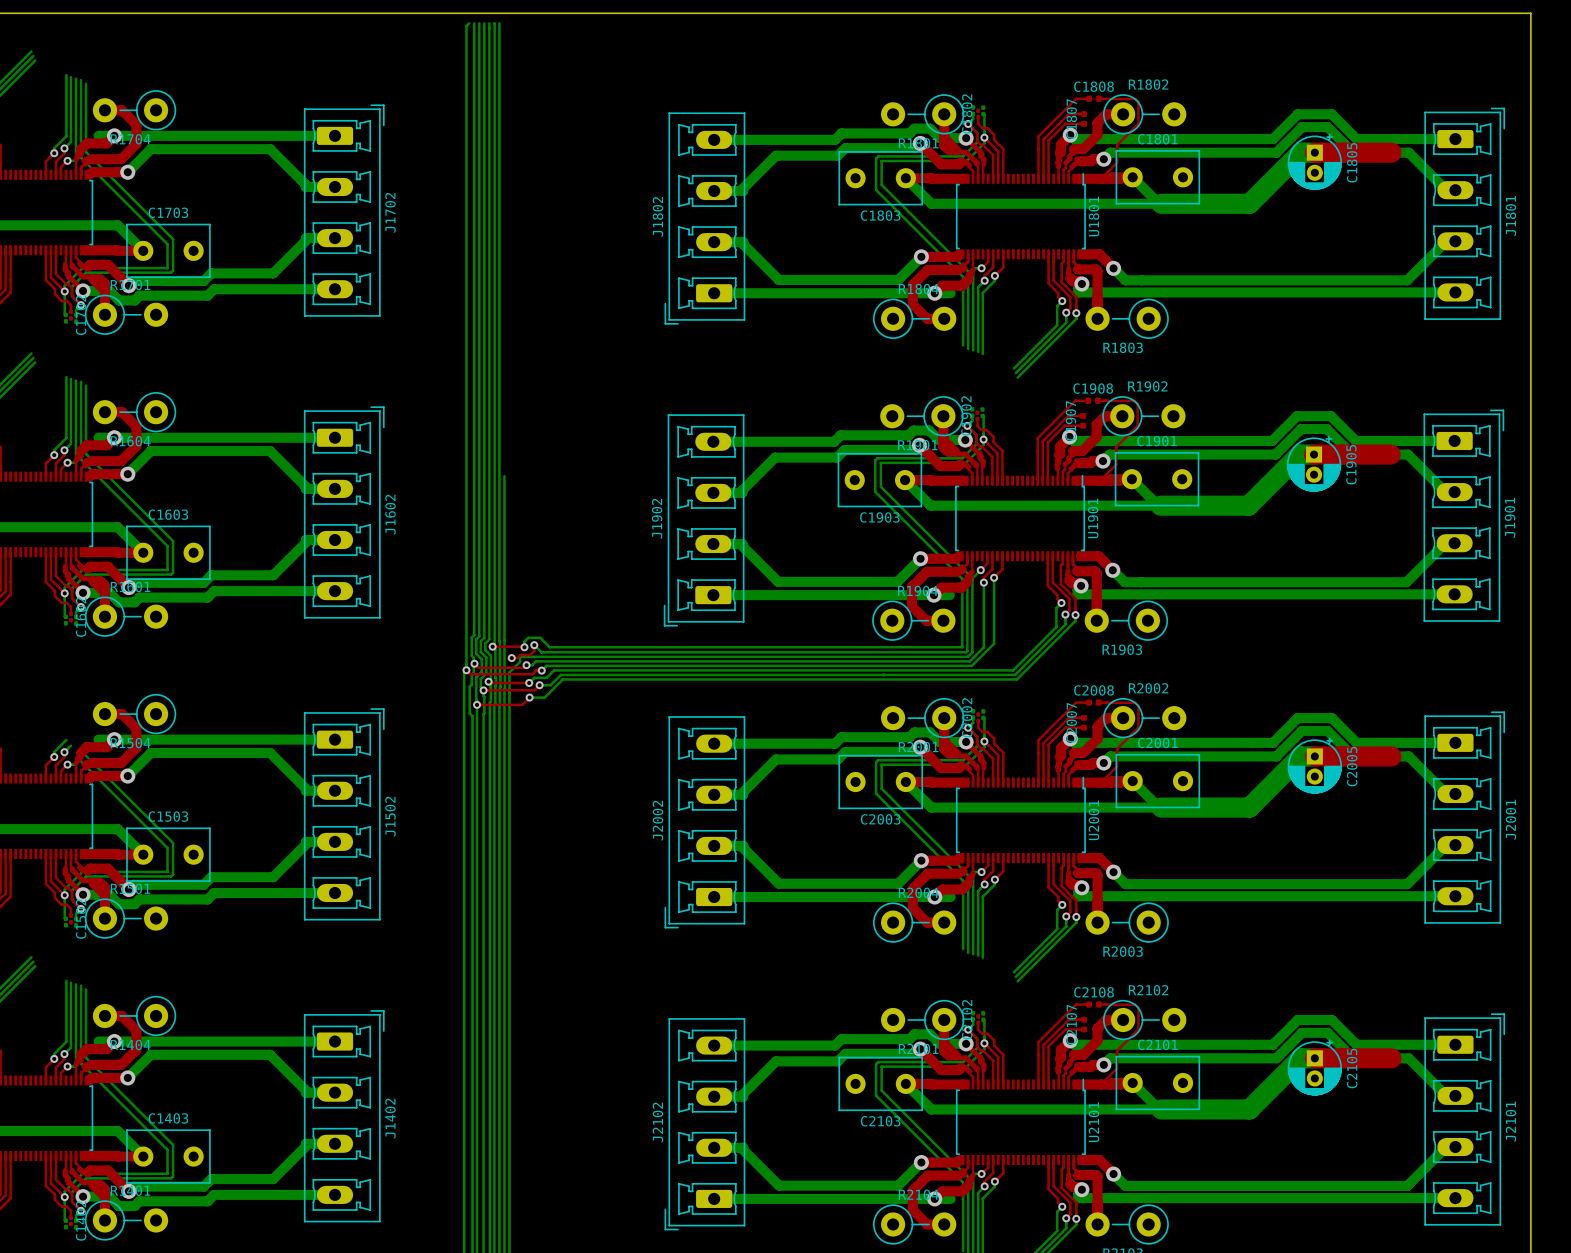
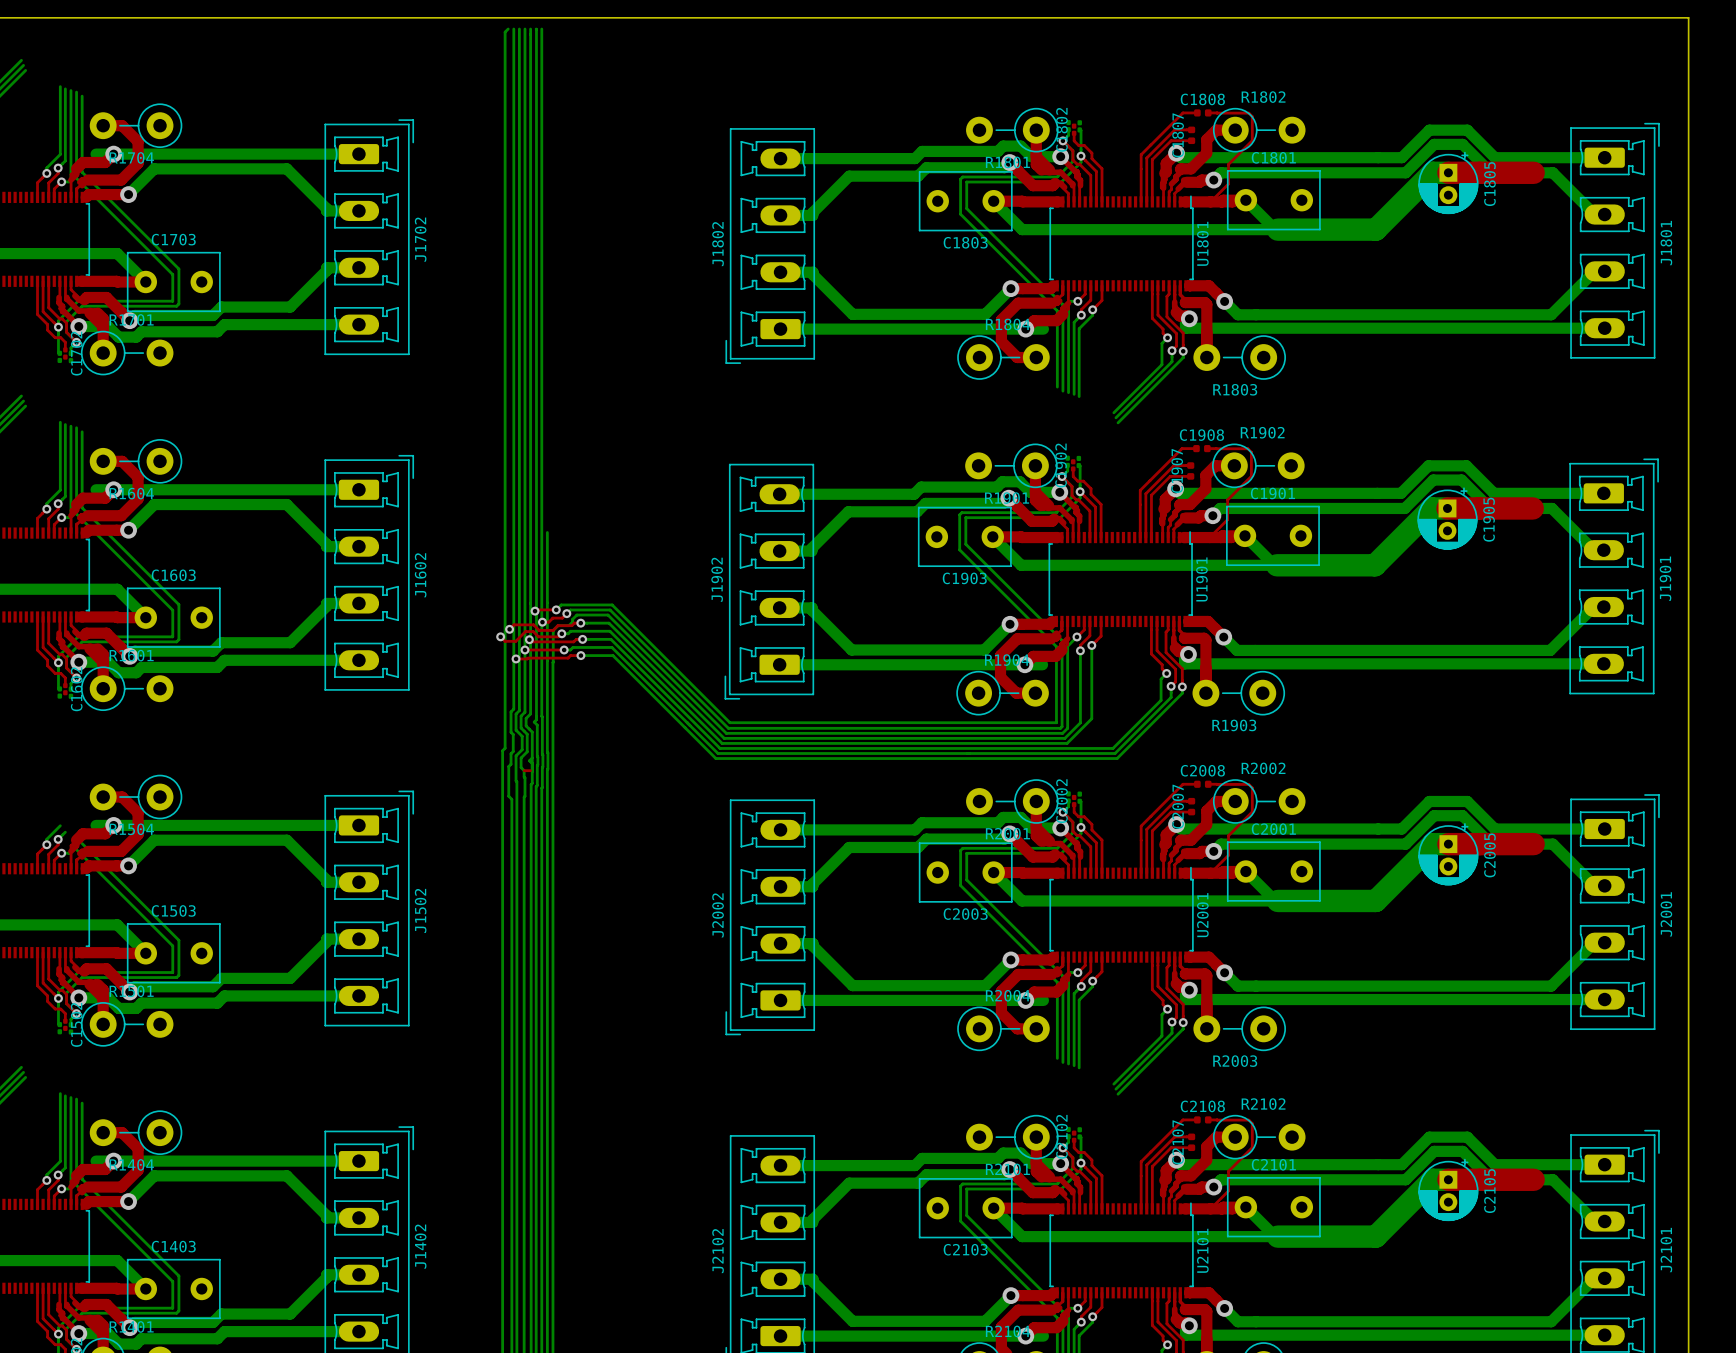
top track: none -> (556, 609) (535, 611)
via: none -> (556, 609)
via: none -> (535, 611)
top track: none -> (566, 613) (562, 618) (552, 618) (548, 622) (542, 622)
via: none -> (566, 613)
via: none -> (542, 622)
top track: none -> (580, 623) (574, 623) (571, 625) (557, 625) (553, 630) (539, 630) (533, 624) (514, 624) (509, 629)
via: none -> (580, 623)
via: none -> (509, 629)
top track: none -> (561, 633) (558, 636) (538, 636) (533, 631) (525, 631) (515, 641) (505, 641) (500, 636)
via: none -> (561, 633)
via: none -> (500, 636)
via: none -> (529, 639)
top track: none -> (582, 639) (576, 639) (573, 641) (531, 641) (529, 639)
via: none -> (582, 639)
top track: none -> (524, 649) (564, 649)
via: none -> (524, 649)
bottom track: none -> (564, 649) (570, 649) (573, 647) (611, 647) (690, 725)
via: none -> (564, 649)
top track: none -> (580, 655) (570, 655) (568, 658) (516, 658)
via: none -> (580, 655)
via: none -> (516, 658)
top track: (534, 645) (534, 650) (530, 655) (520, 655) (517, 658) (511, 658) -> none
bottom track: (534, 645) (541, 652) (667, 652) -> (566, 613) (570, 609) (610, 609) (728, 728)
via: (534, 645) -> none
top track: (492, 646) (524, 647) -> none
via: (492, 646) -> none
bottom track: (524, 647) (524, 641) (528, 637) (540, 637) (549, 647) (668, 647) -> (556, 609) (561, 604) (612, 604) (729, 722)
via: (524, 647) -> none
bottom track: (665, 656) (520, 656) (520, 661) (509, 672) -> (726, 733) (608, 615) (576, 615) (568, 625) (558, 625) (553, 630) (552, 750)
via: (511, 658) -> none
bottom track: (663, 661) (536, 661) (532, 665) (526, 665) -> (724, 738) (609, 623) (580, 623)
top track: (474, 663) (478, 667) (523, 667) (526, 665) -> none
via: (474, 663) -> none
via: (526, 665) -> none
bottom track: (661, 665) (546, 665) (541, 670) -> (722, 743) (610, 631) (570, 631) (568, 633) (561, 633)
top track: (466, 670) (470, 674) (532, 674) (536, 670) (541, 670) -> none
via: (466, 670) -> none
via: (541, 670) -> none
bottom track: (659, 670) (554, 670) (546, 677) (534, 677) (529, 682) -> (720, 748) (610, 639) (582, 639)
bottom track: (657, 674) (560, 674) (550, 685) (539, 685) -> (718, 753) (687, 722)
bottom track: (656, 679) (562, 679) (544, 697) (529, 697) -> (715, 758) (612, 655) (580, 655)
top track: (488, 681) (529, 682) -> none
via: (488, 681) -> none
via: (529, 682) -> none
top track: (539, 685) (534, 690) (489, 690) -> none
via: (539, 685) -> none
via: (483, 690) -> none
top track: (529, 697) (522, 704) (477, 704) -> none
via: (529, 697) -> none
via: (477, 704) -> none

